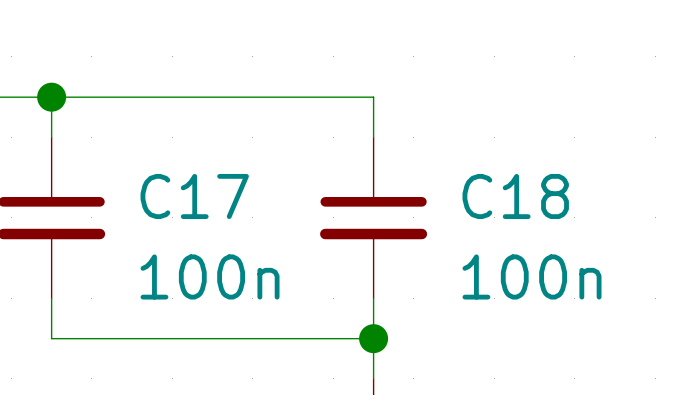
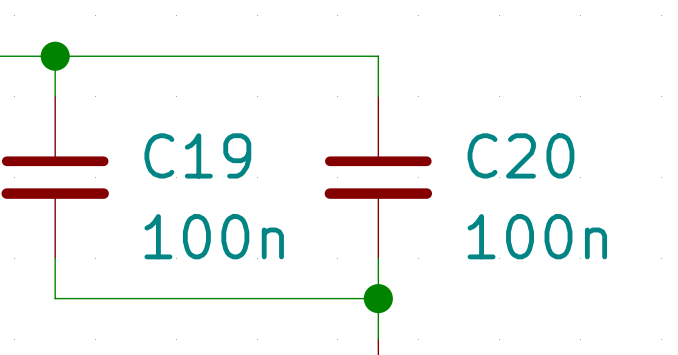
C17 name: C17 (194, 196) -> C19 (197, 155)
C18 name: C18 (515, 196) -> C20 (520, 155)

